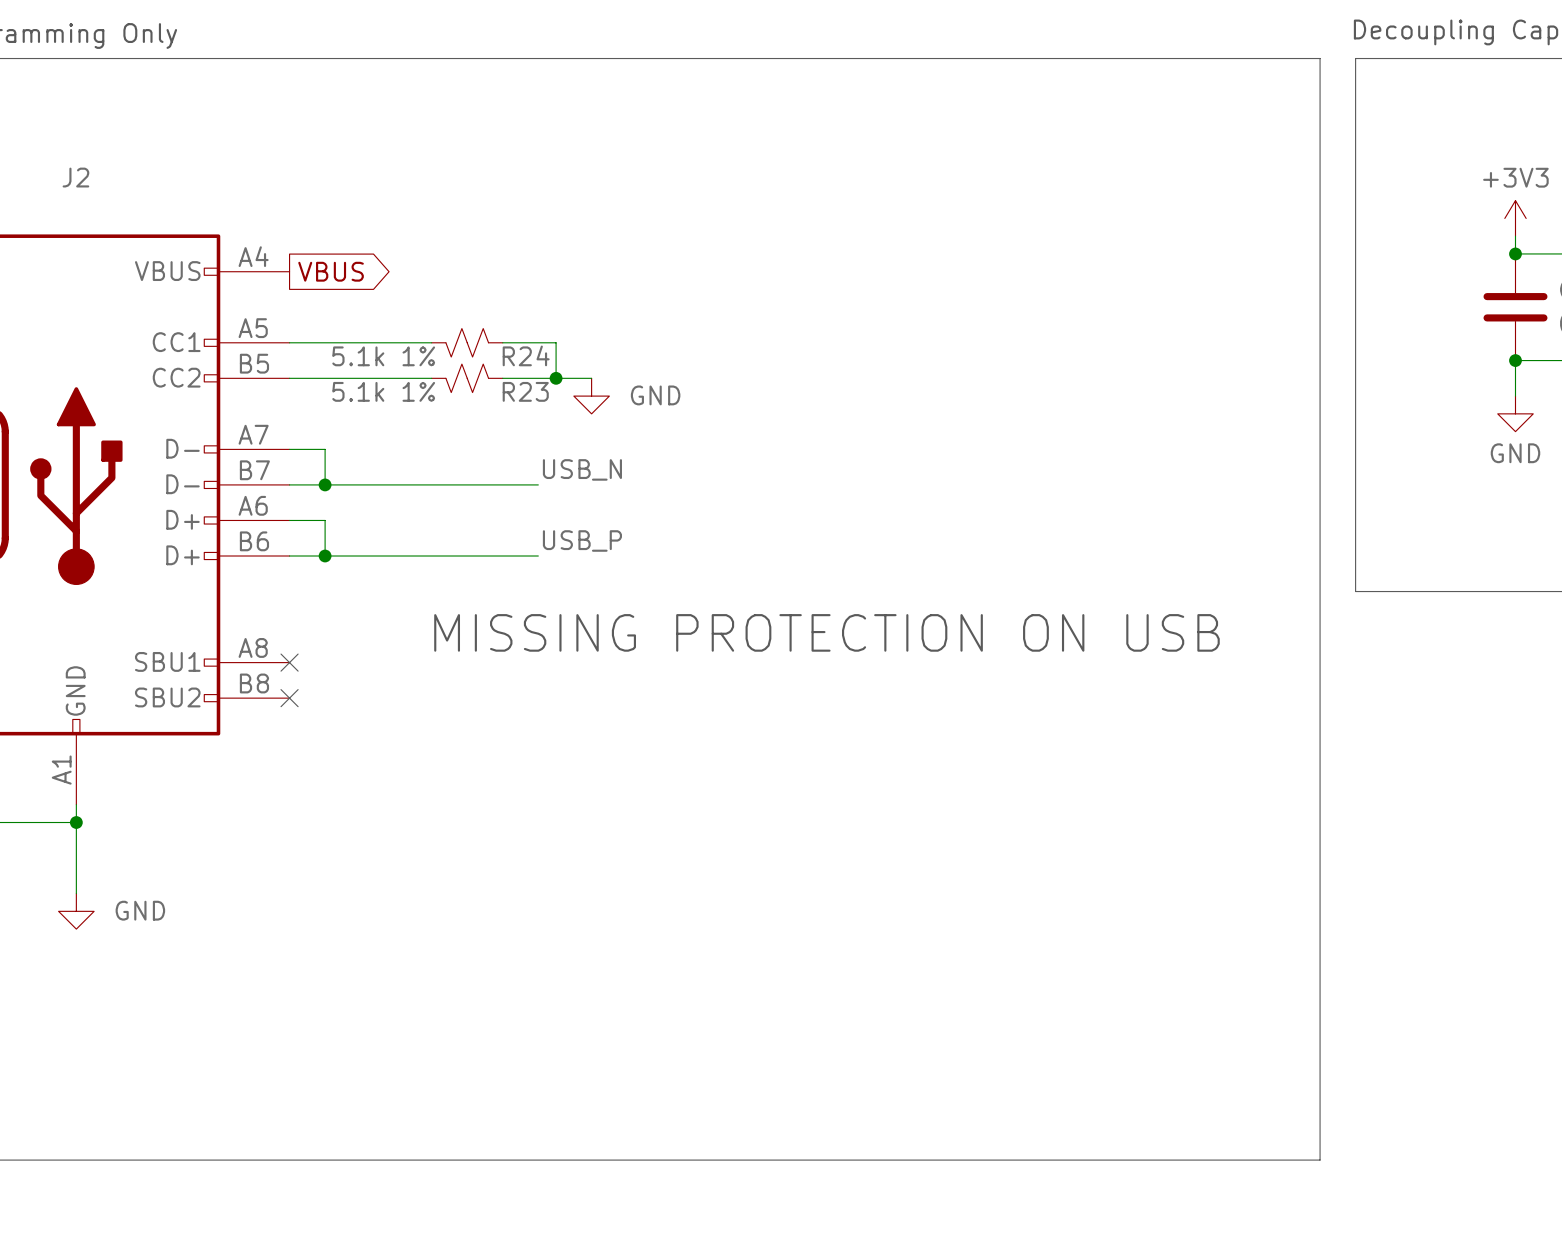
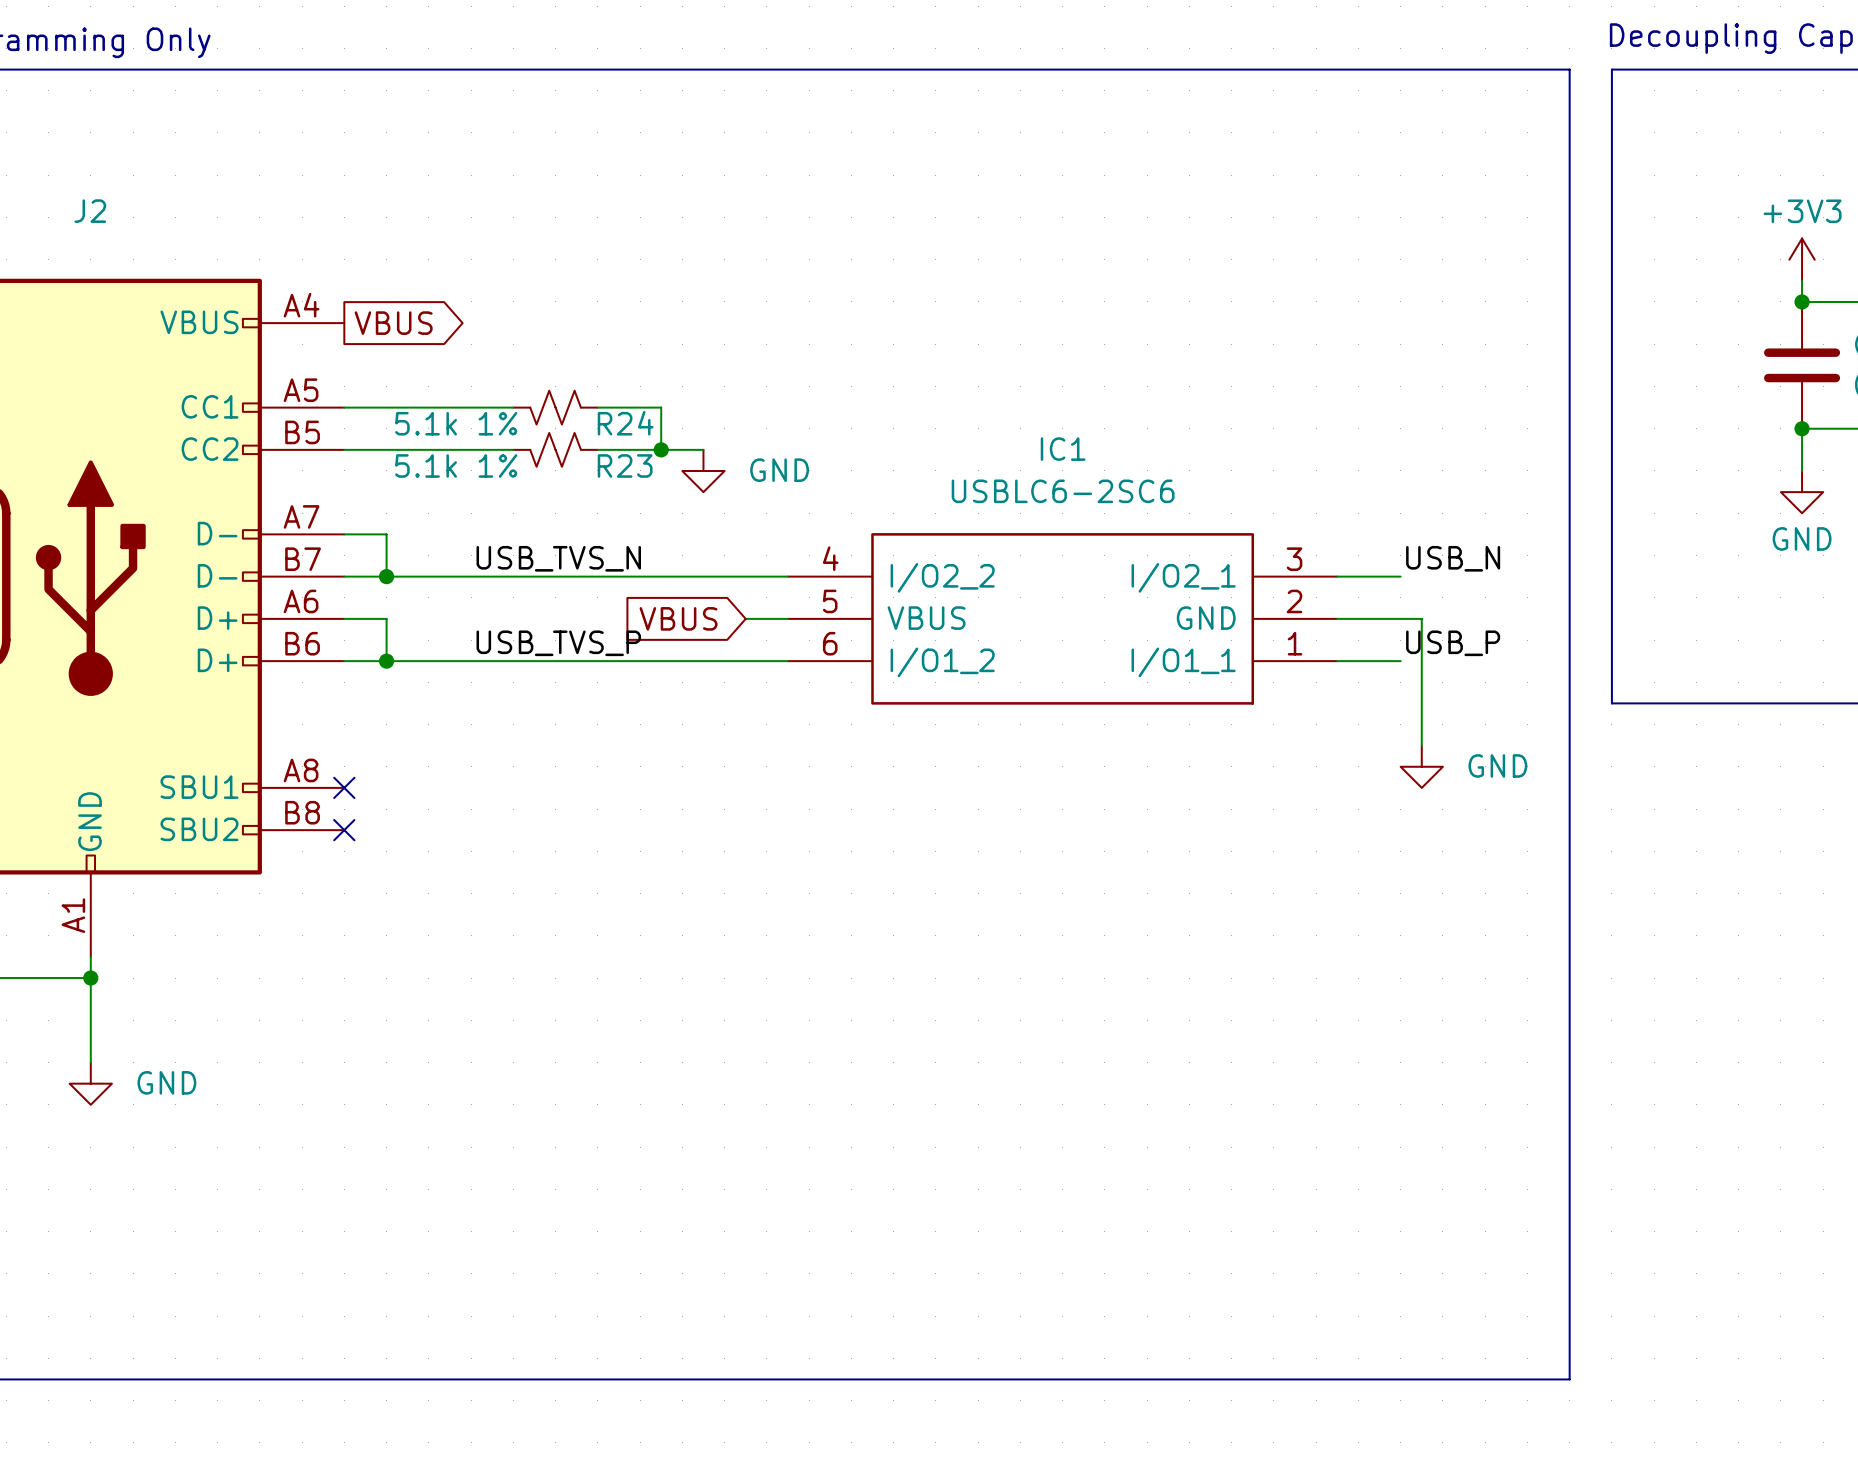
label: USB_N (582, 469) -> USB_TVS_N (558, 558)
label: none -> USB_N (1453, 558)
wire: none -> (640, 576) (787, 576)
wire: none -> (1337, 576) (1400, 576)
global label: none -> VBUS (678, 618)
wire: none -> (745, 618) (787, 618)
IC1: none -> USBLC6-2SC6 (1062, 618)
wire: none -> (1337, 618) (1421, 618) (1421, 745)
label: USB_P (582, 540) -> USB_TVS_P (558, 643)
label: none -> USB_P (1453, 643)
wire: none -> (640, 661) (787, 661)
wire: none -> (1337, 661) (1400, 661)
text: MISSING PROTECTION ON USB (826, 632) -> none
power symbol: none -> GND (1421, 766)

